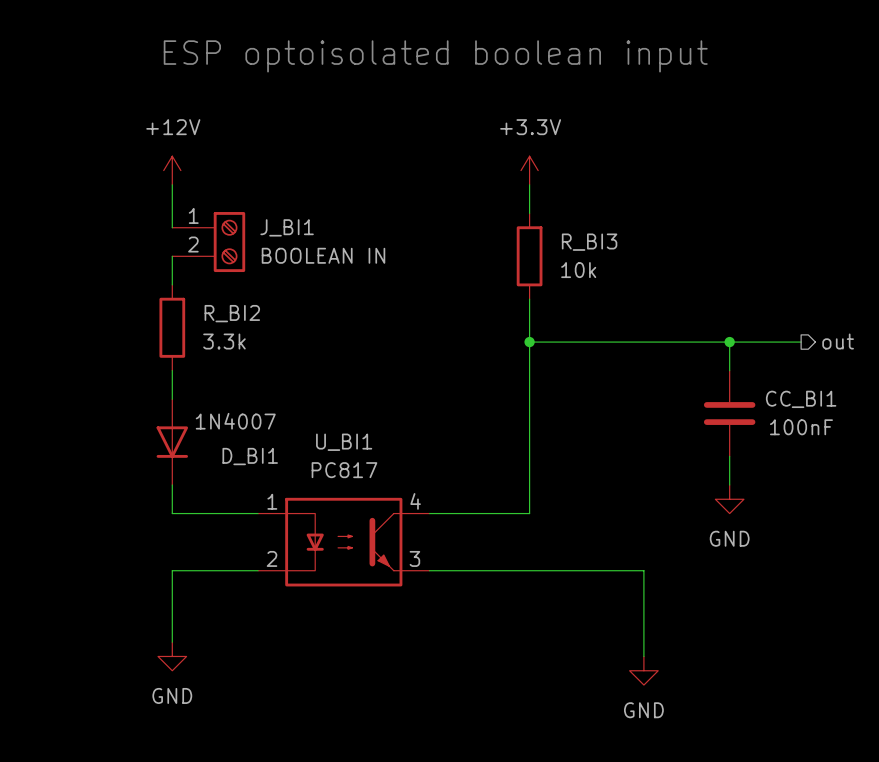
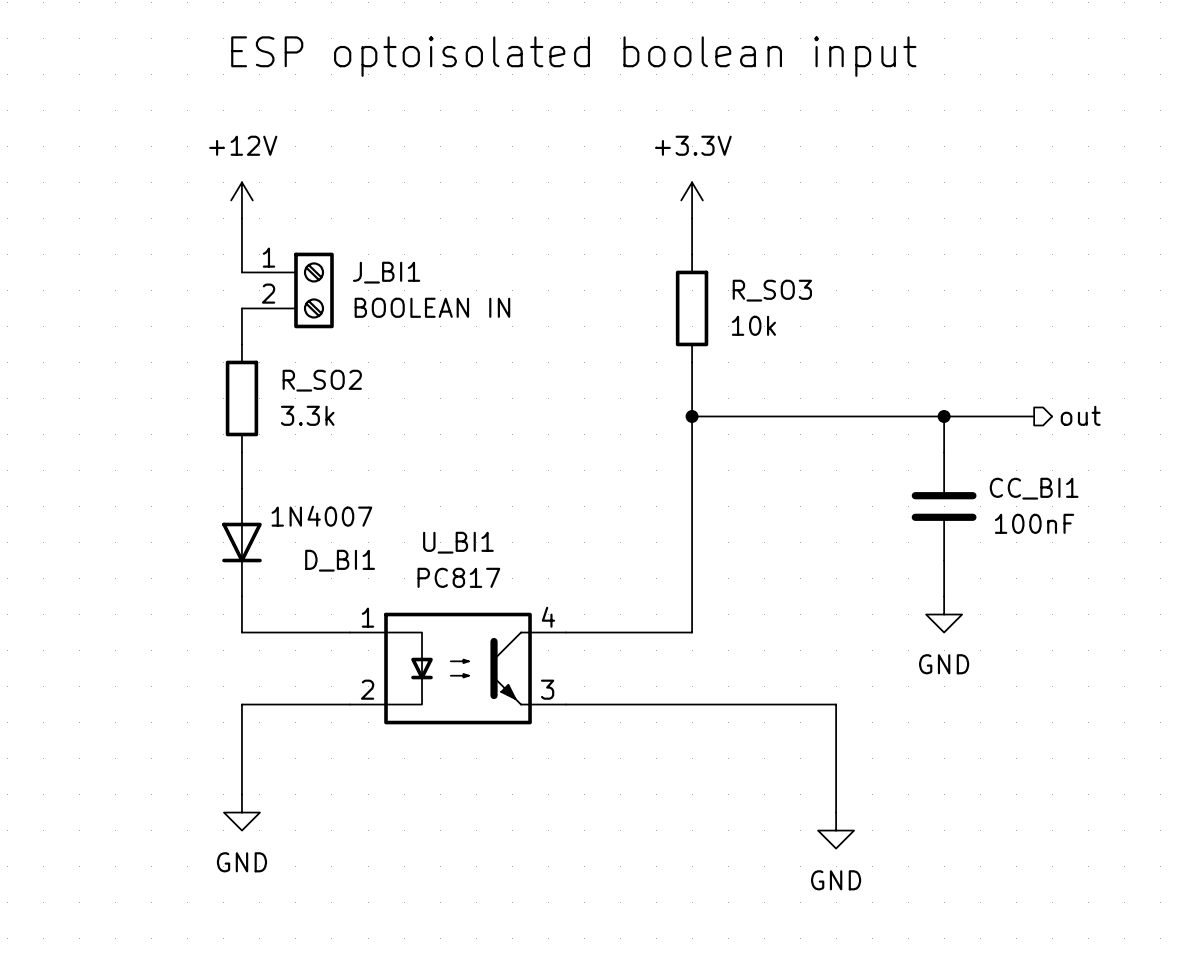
R_BI3 name: R_BI3 (589, 242) -> R_SO3 (772, 290)
R_BI2 name: R_BI2 (232, 313) -> R_SO2 (322, 380)

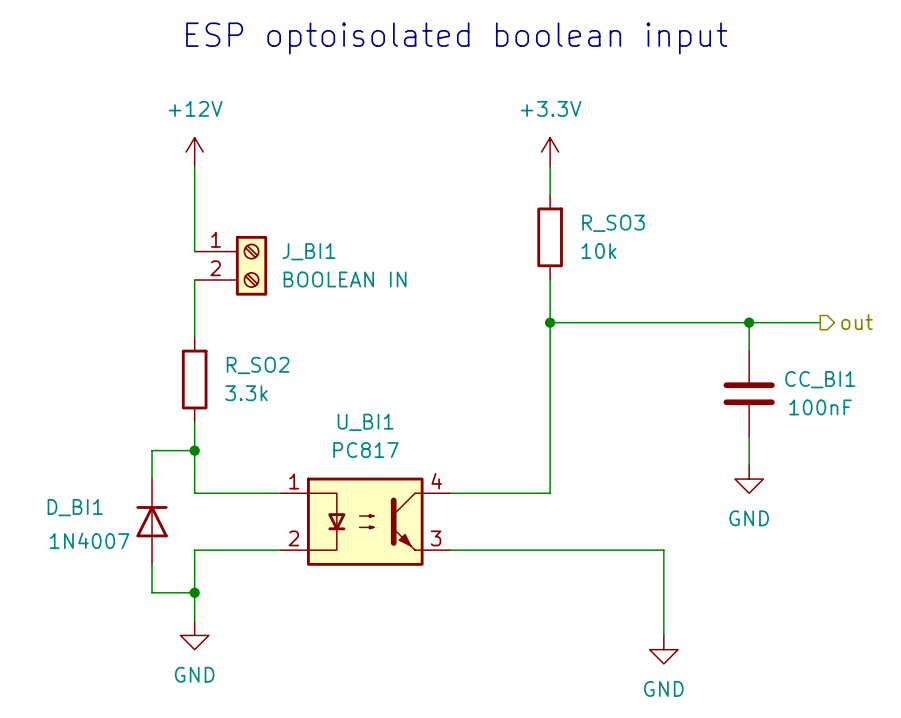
J_BI1 position: (287, 290) -> (230, 265)
wire: (241, 326) (241, 344) -> none
wire: none -> (194, 280) (194, 336)
R_SO2 position: (241, 398) -> (194, 379)
wire: (241, 452) (241, 488) -> (194, 208) (194, 237)
D_BI1 rotation: 0° (241, 542) -> 180° (152, 521)
D_BI1 position: (241, 542) -> (152, 521)
wire: none -> (194, 450) (152, 450) (152, 479)
junction: none -> (194, 450)
wire: none -> (152, 564) (152, 592) (194, 592)
junction: none -> (194, 592)

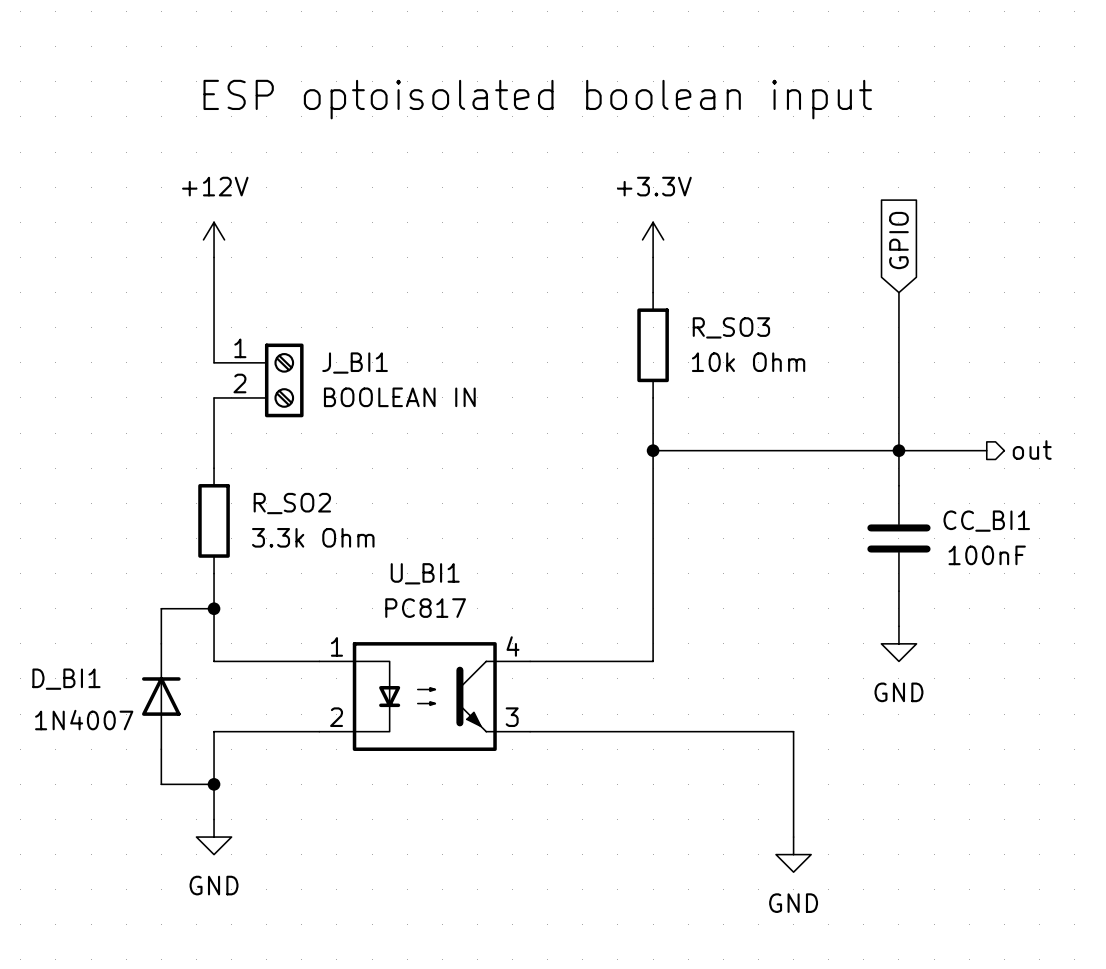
global label: none -> GPIO (898, 240)
wire: none -> (898, 292) (898, 450)
R_SO3 value: 10k (598, 251) -> 10k Ohm (748, 362)
R_SO2 value: 3.3k (246, 393) -> 3.3k Ohm (313, 537)

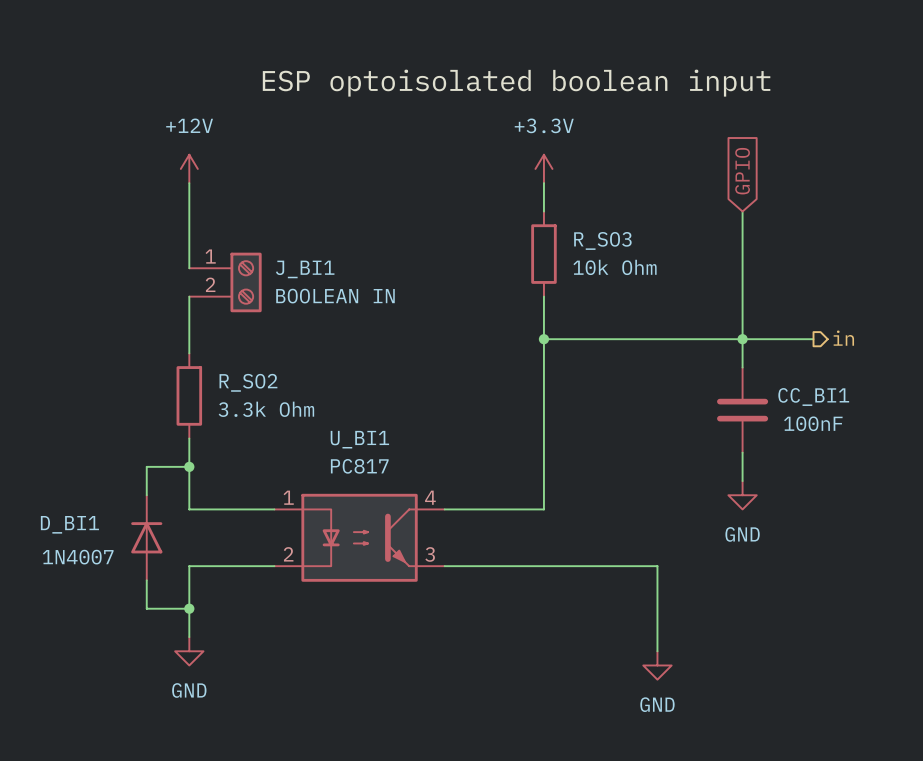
text: ESP optoisolated boolean input (537, 99) -> none
label: none -> ESP optoisolated boolean input (516, 83)
hierarchical label: out (1032, 450) -> in (843, 338)

